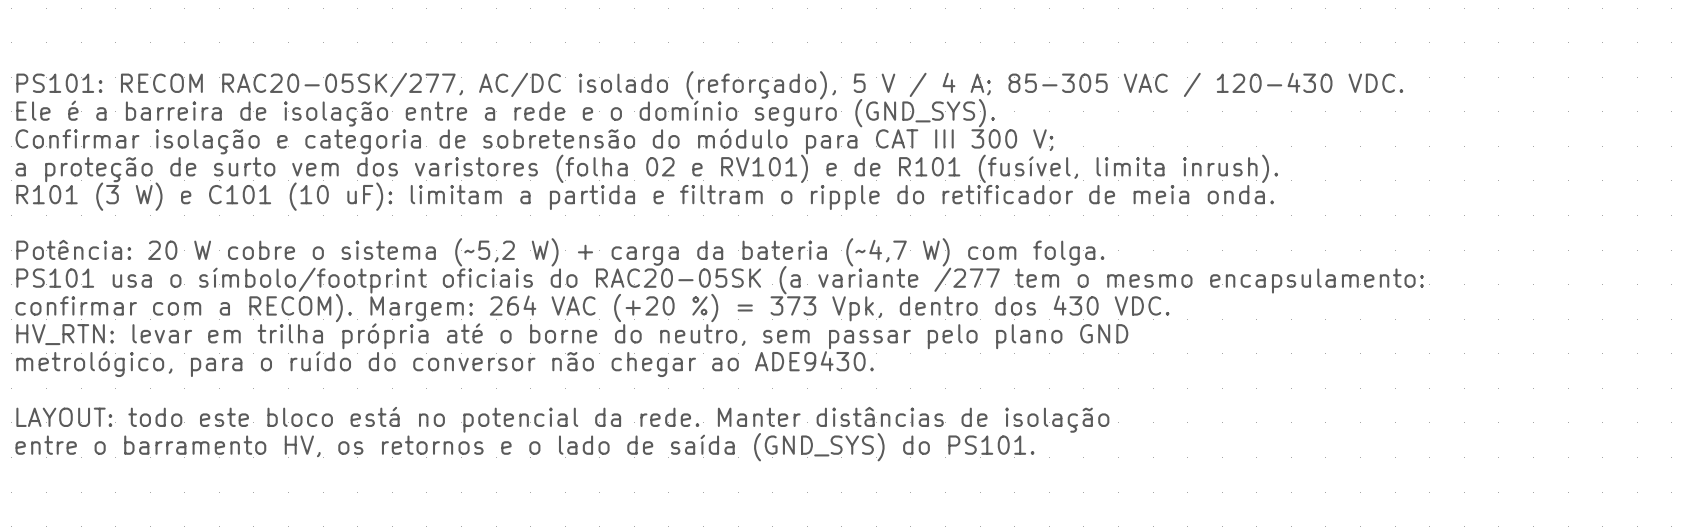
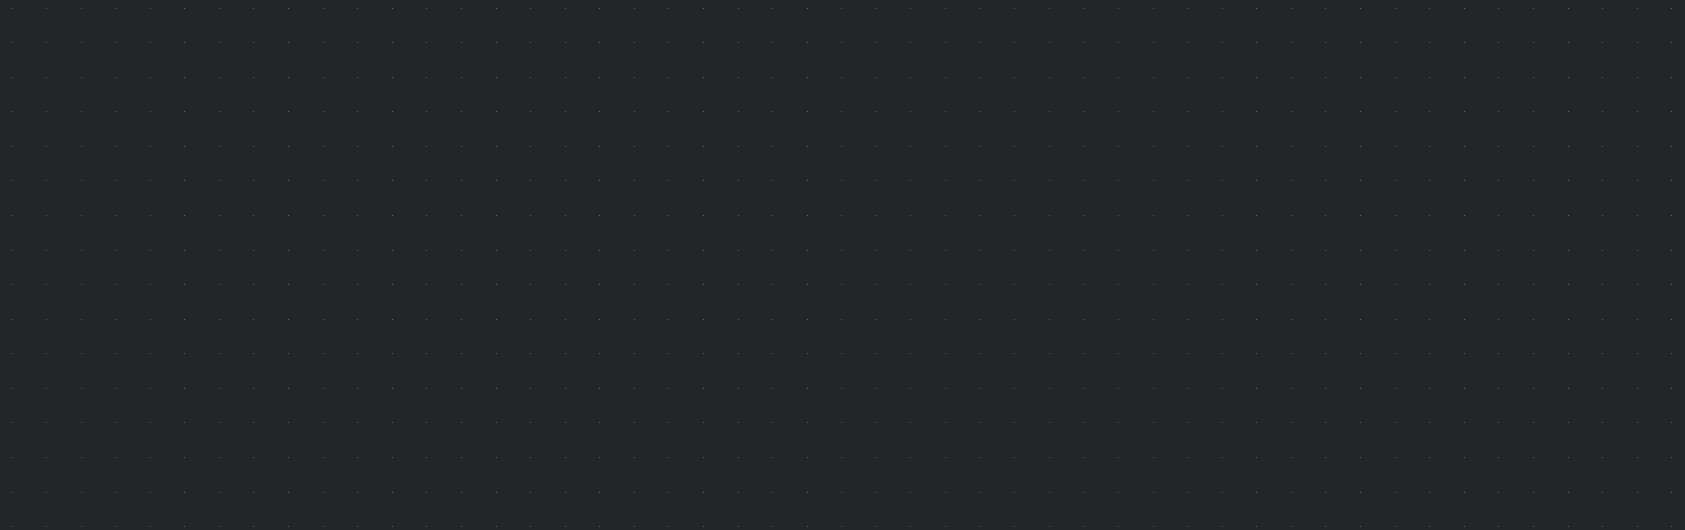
text: PS101: RECOM RAC20-05SK/277, AC/DC isolado (reforçado), 5 V / 4 A; 85-305 VAC / 120-430 VDC. (709, 85) -> none
text: Ele é a barreira de isolação entre a rede e o domínio seguro (GND_SYS). (505, 113) -> none
text: Confirmar isolação e categoria de sobretensão do módulo para CAT III 300 V; (534, 141) -> none
text: a proteção de surto vem dos varistores (folha 02 e RV101) e de R101 (fusível, limita inrush). (646, 168) -> none
text: R101 (3 W) e C101 (10 uF): limitam a partida e filtram o ripple do retificador de meia onda. (645, 196) -> none
text: Potência: 20 W cobre o sistema (~5,2 W) + carga da bateria (~4,7 W) com folga. (560, 252) -> none
text: PS101 usa o símbolo/footprint oficiais do RAC20-05SK (a variante /277 tem o mesmo encapsulamento: (720, 280) -> none
text: confirmar com a RECOM). Margem: 264 VAC (+20 %) = 373 Vpk, dentro dos 430 VDC. (592, 308) -> none
text: HV_RTN: levar em trilha própria até o borne do neutro, sem passar pelo plano GND (572, 336) -> none
text: metrológico, para o ruído do conversor não chegar ao ADE9430. (445, 364) -> none
text: LAYOUT: todo este bloco está no potencial da rede. Manter distâncias de isolação (562, 419) -> none
text: entre o barramento HV, os retornos e o lado de saída (GND_SYS) do PS101. (524, 447) -> none

